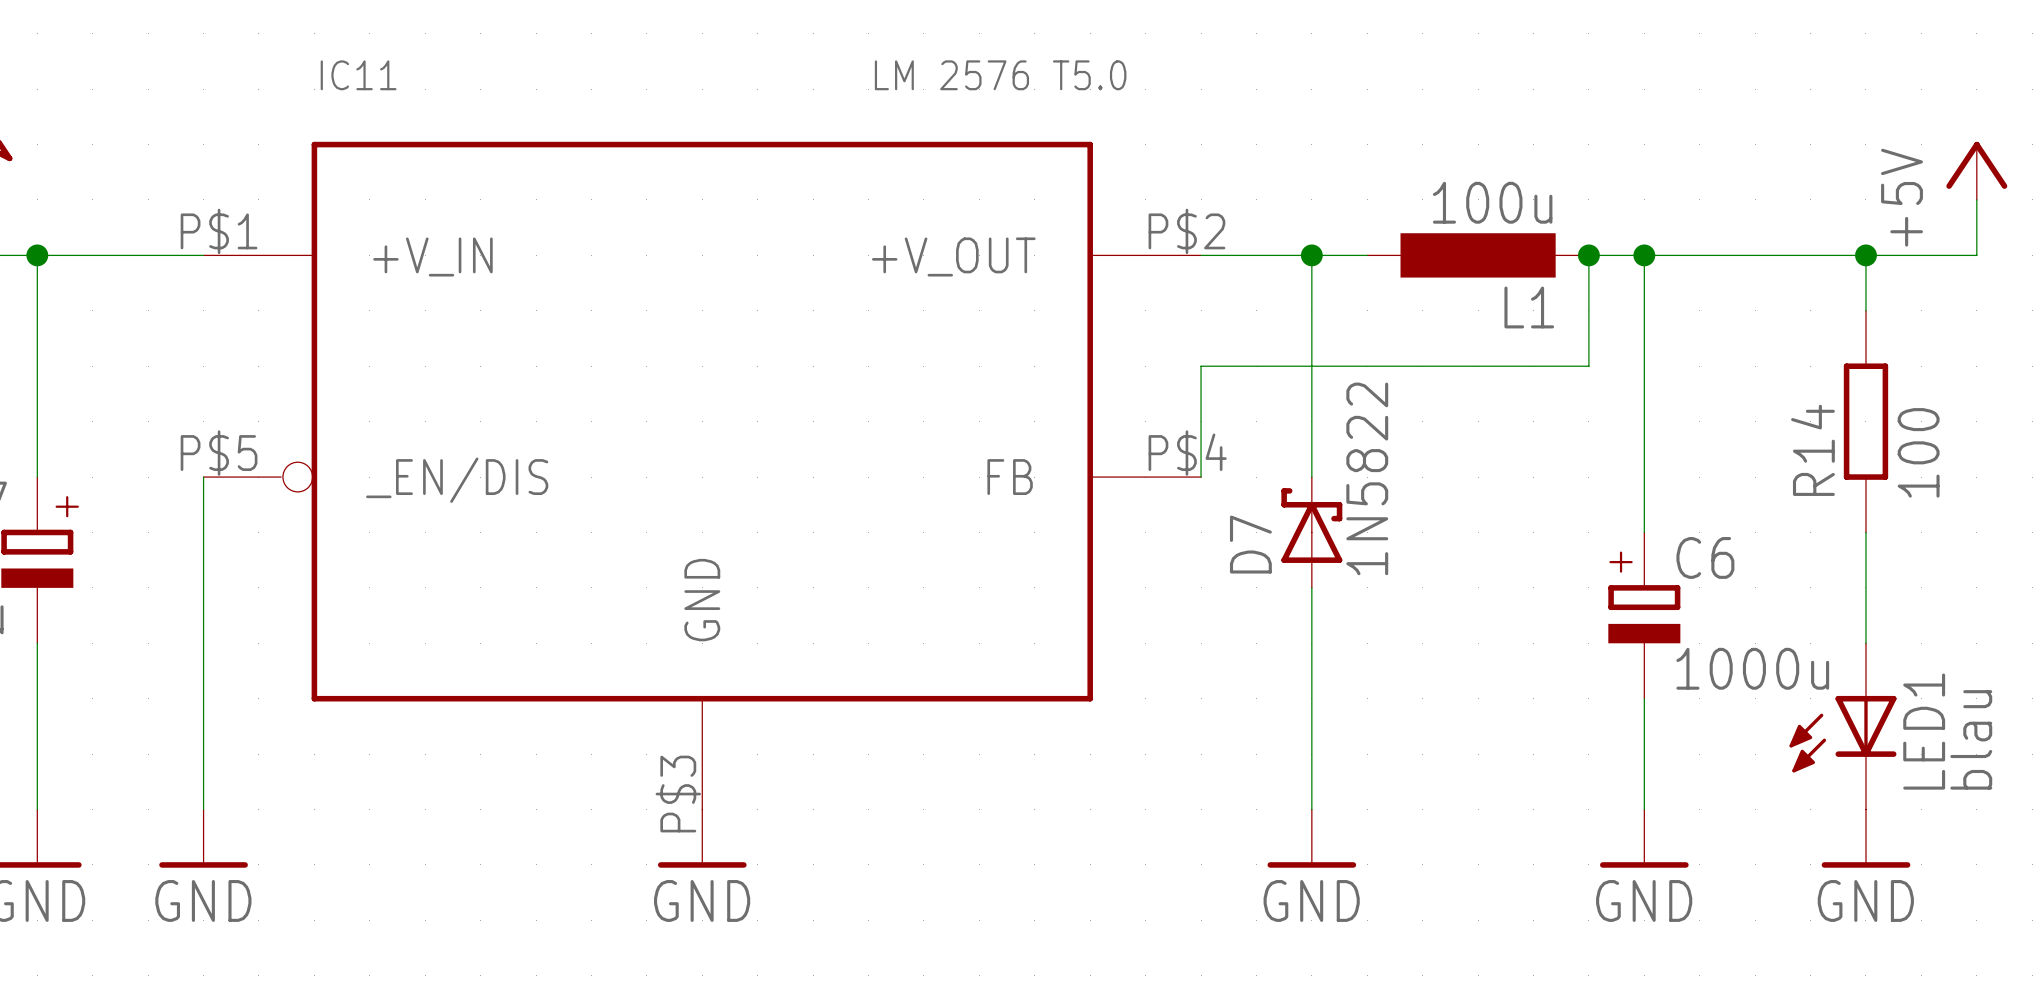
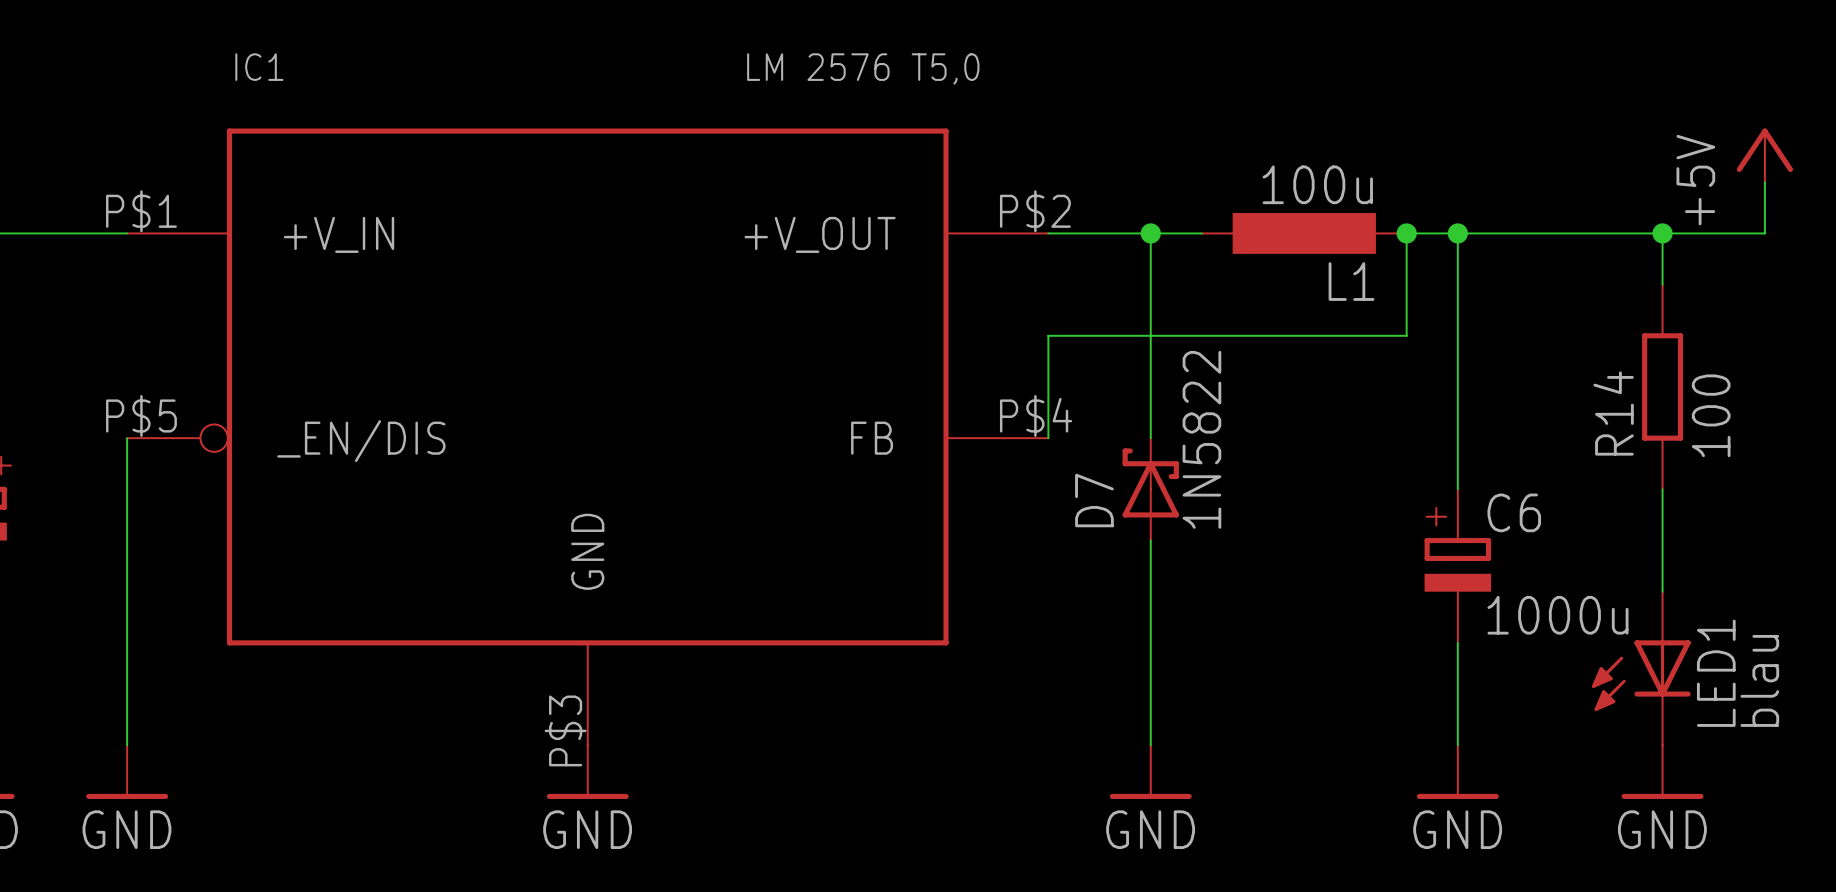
IC11 name: IC11 (358, 75) -> IC1 (259, 67)
IC11 value: LM 2576 T5.0 (1000, 75) -> LM 2576 T5,0 (863, 68)

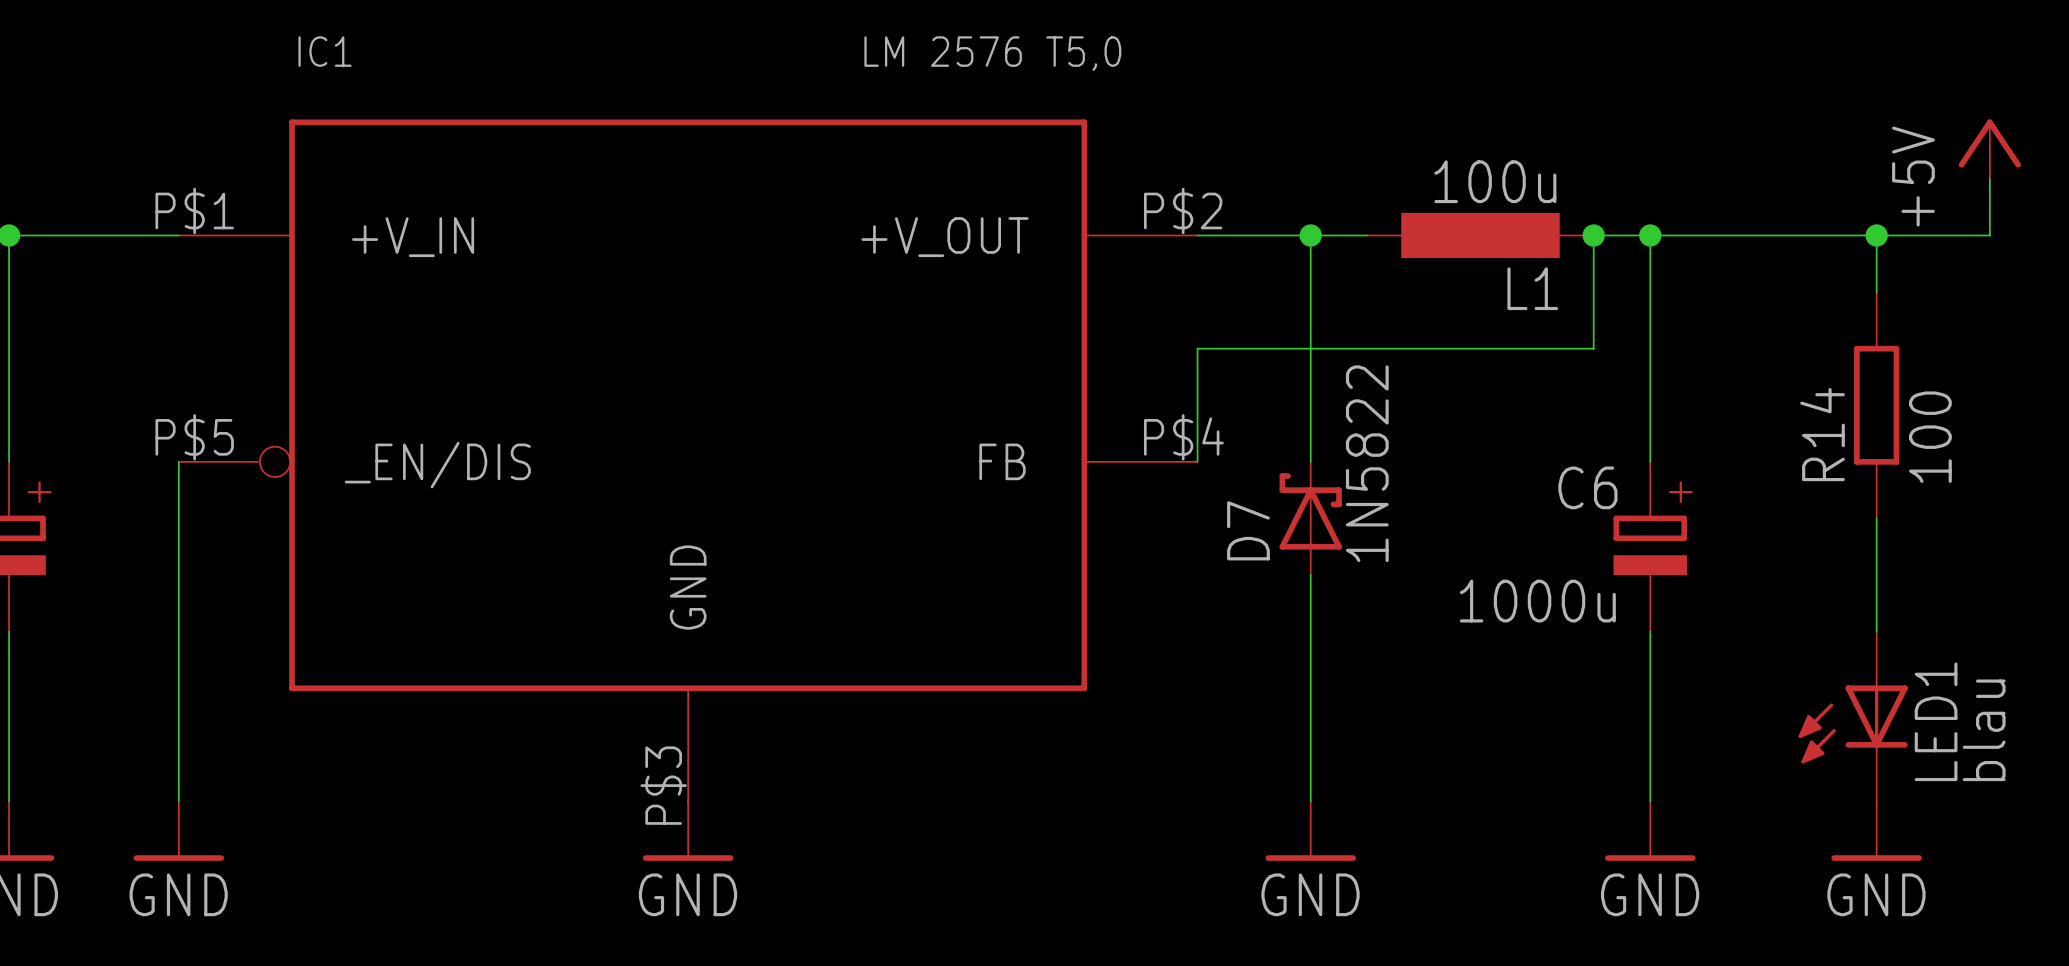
C6 name position: C6 (1514, 512) -> C6 (1587, 487)
C6 text position: + (1436, 516) -> + (1680, 492)
C6 position: (1457, 566) -> (1650, 546)
C6 value position: 1000u (1557, 615) -> 1000u (1537, 601)

